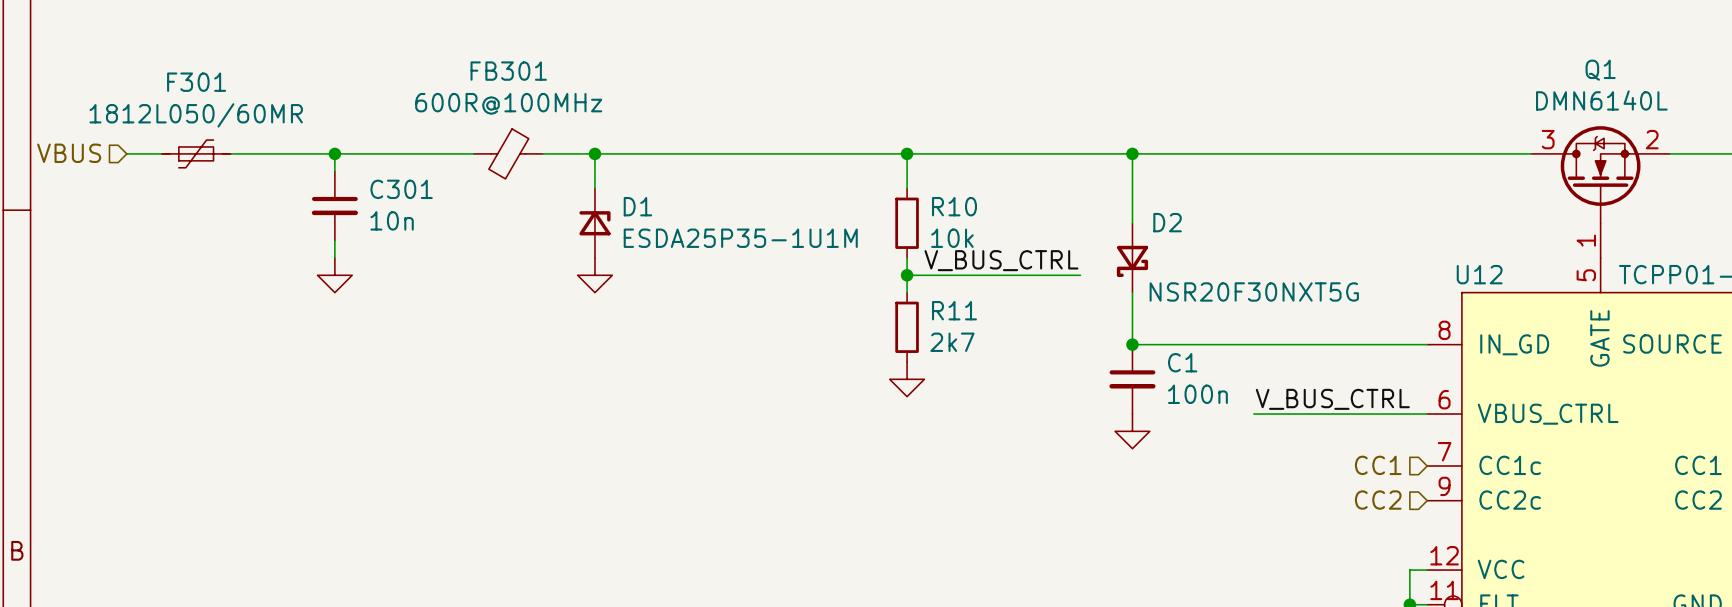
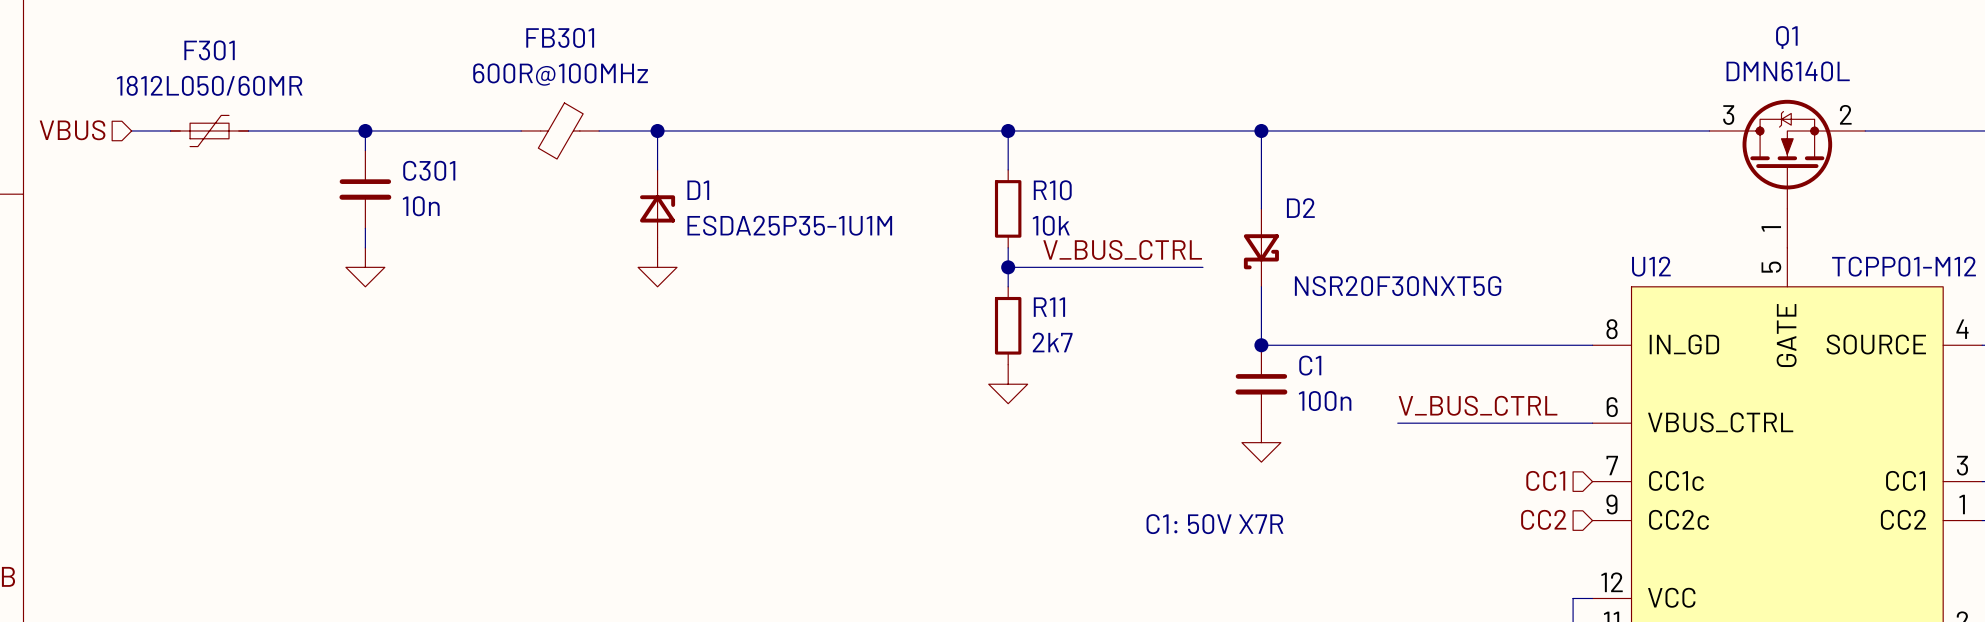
text: none -> C1: 50V X7R (1214, 524)

